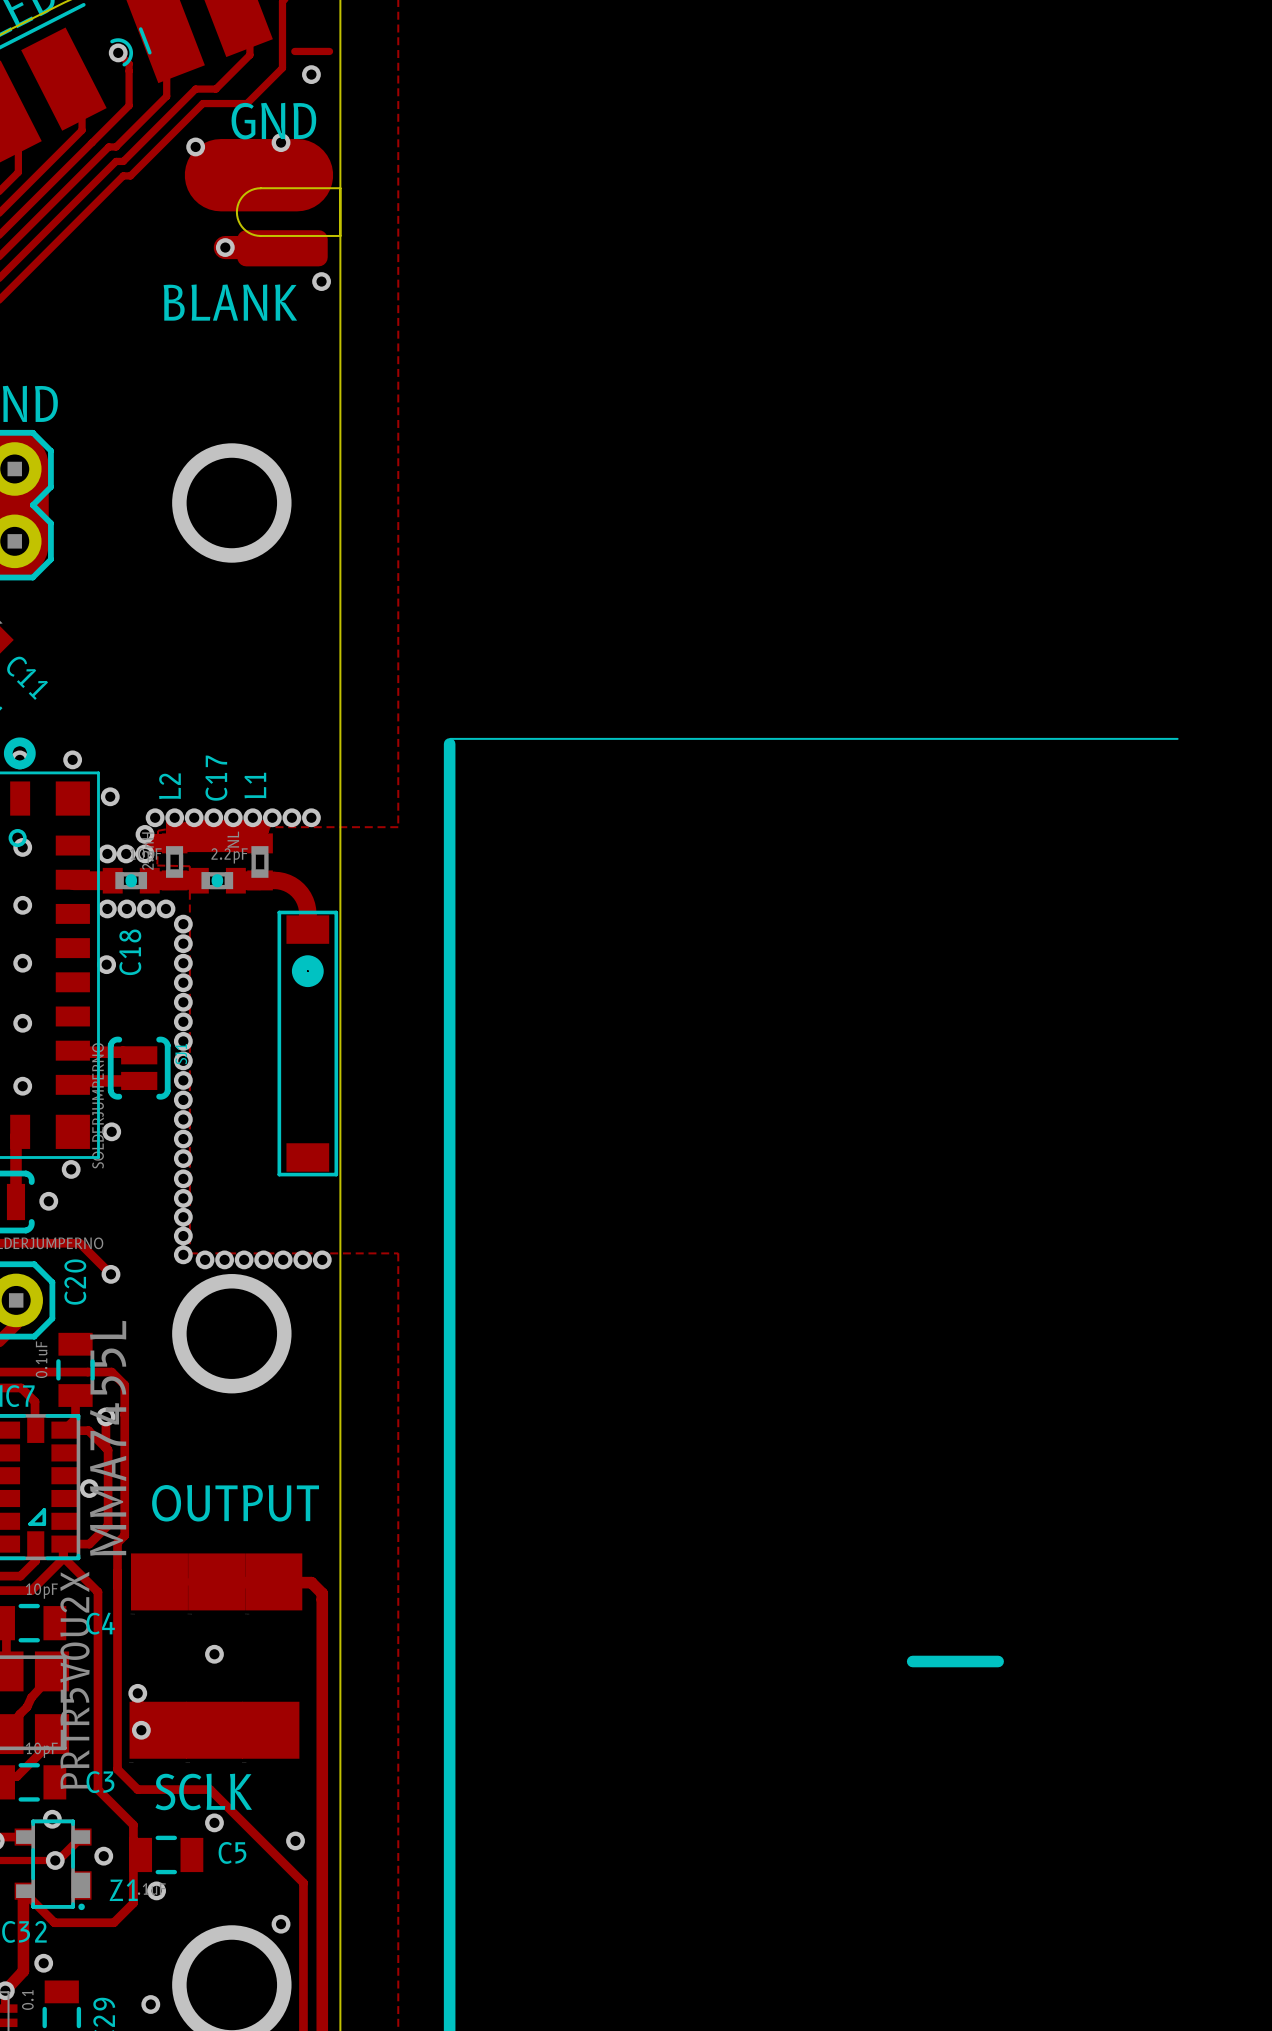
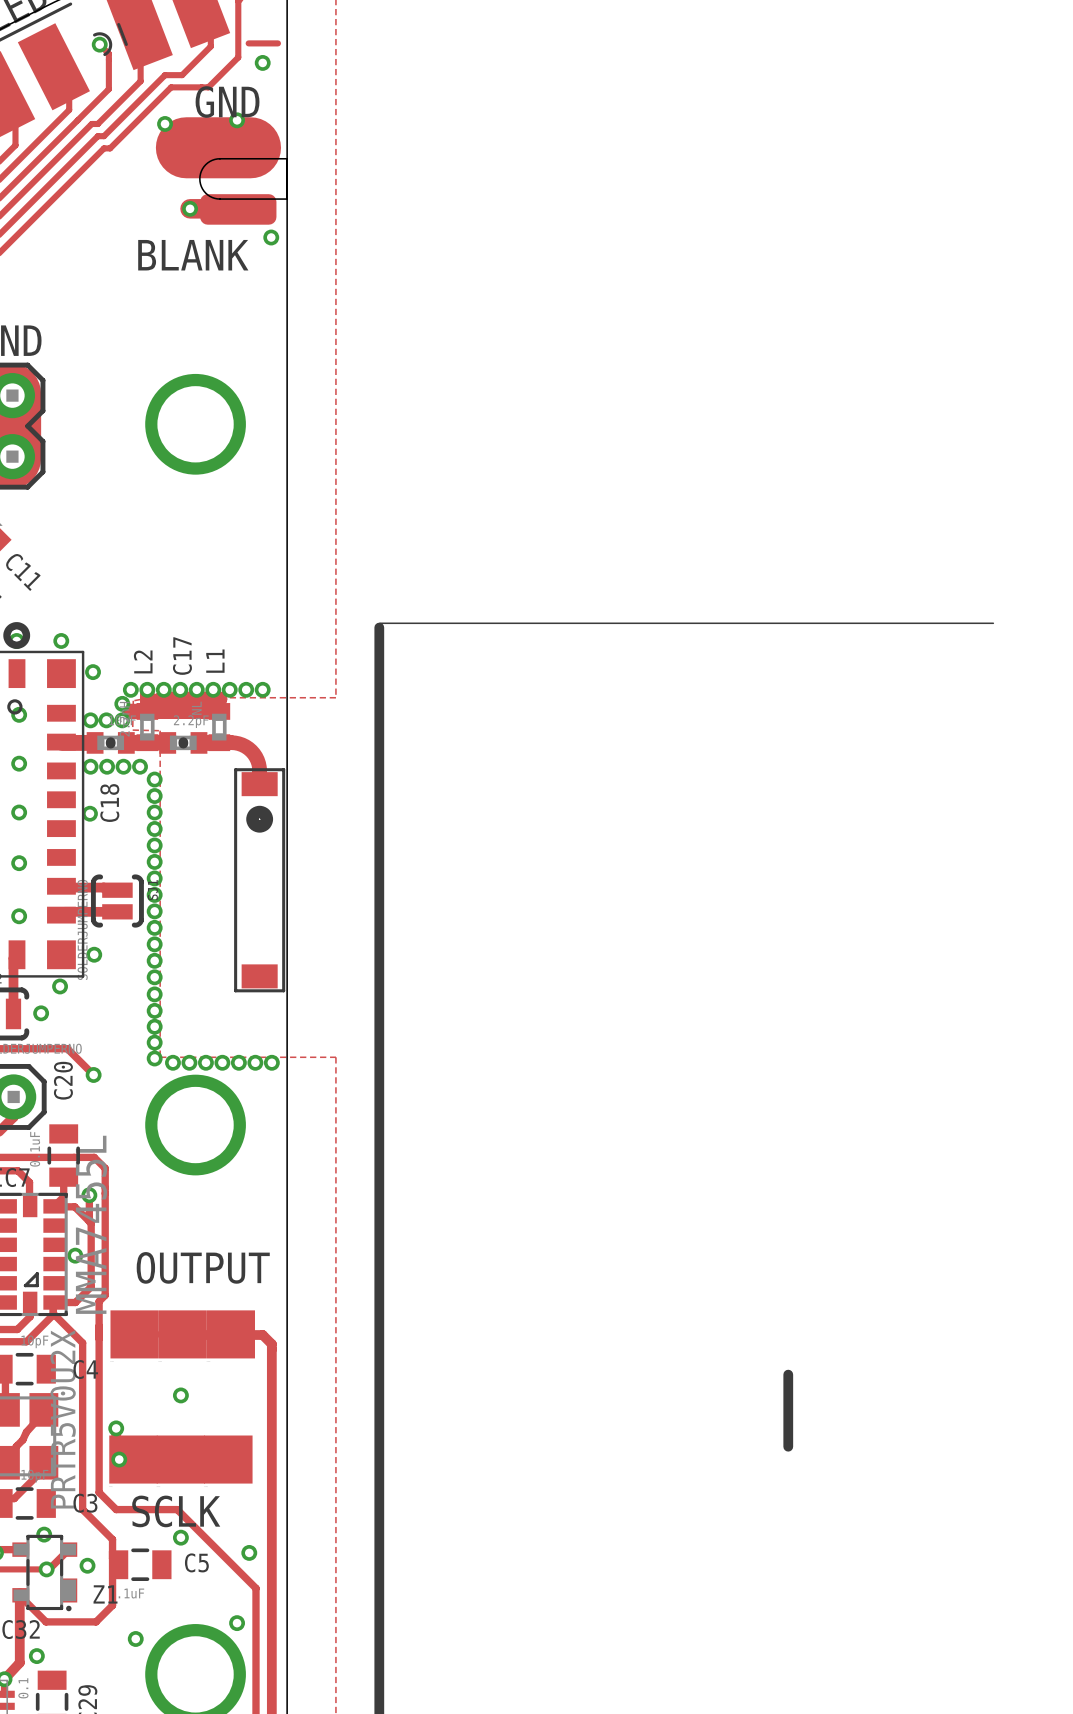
line: none -> (788, 1374) (788, 1446)
line: (912, 1661) (998, 1661) -> none
via: (156, 1890) -> none
via: none -> (135, 1638)
via: (150, 2004) -> none

